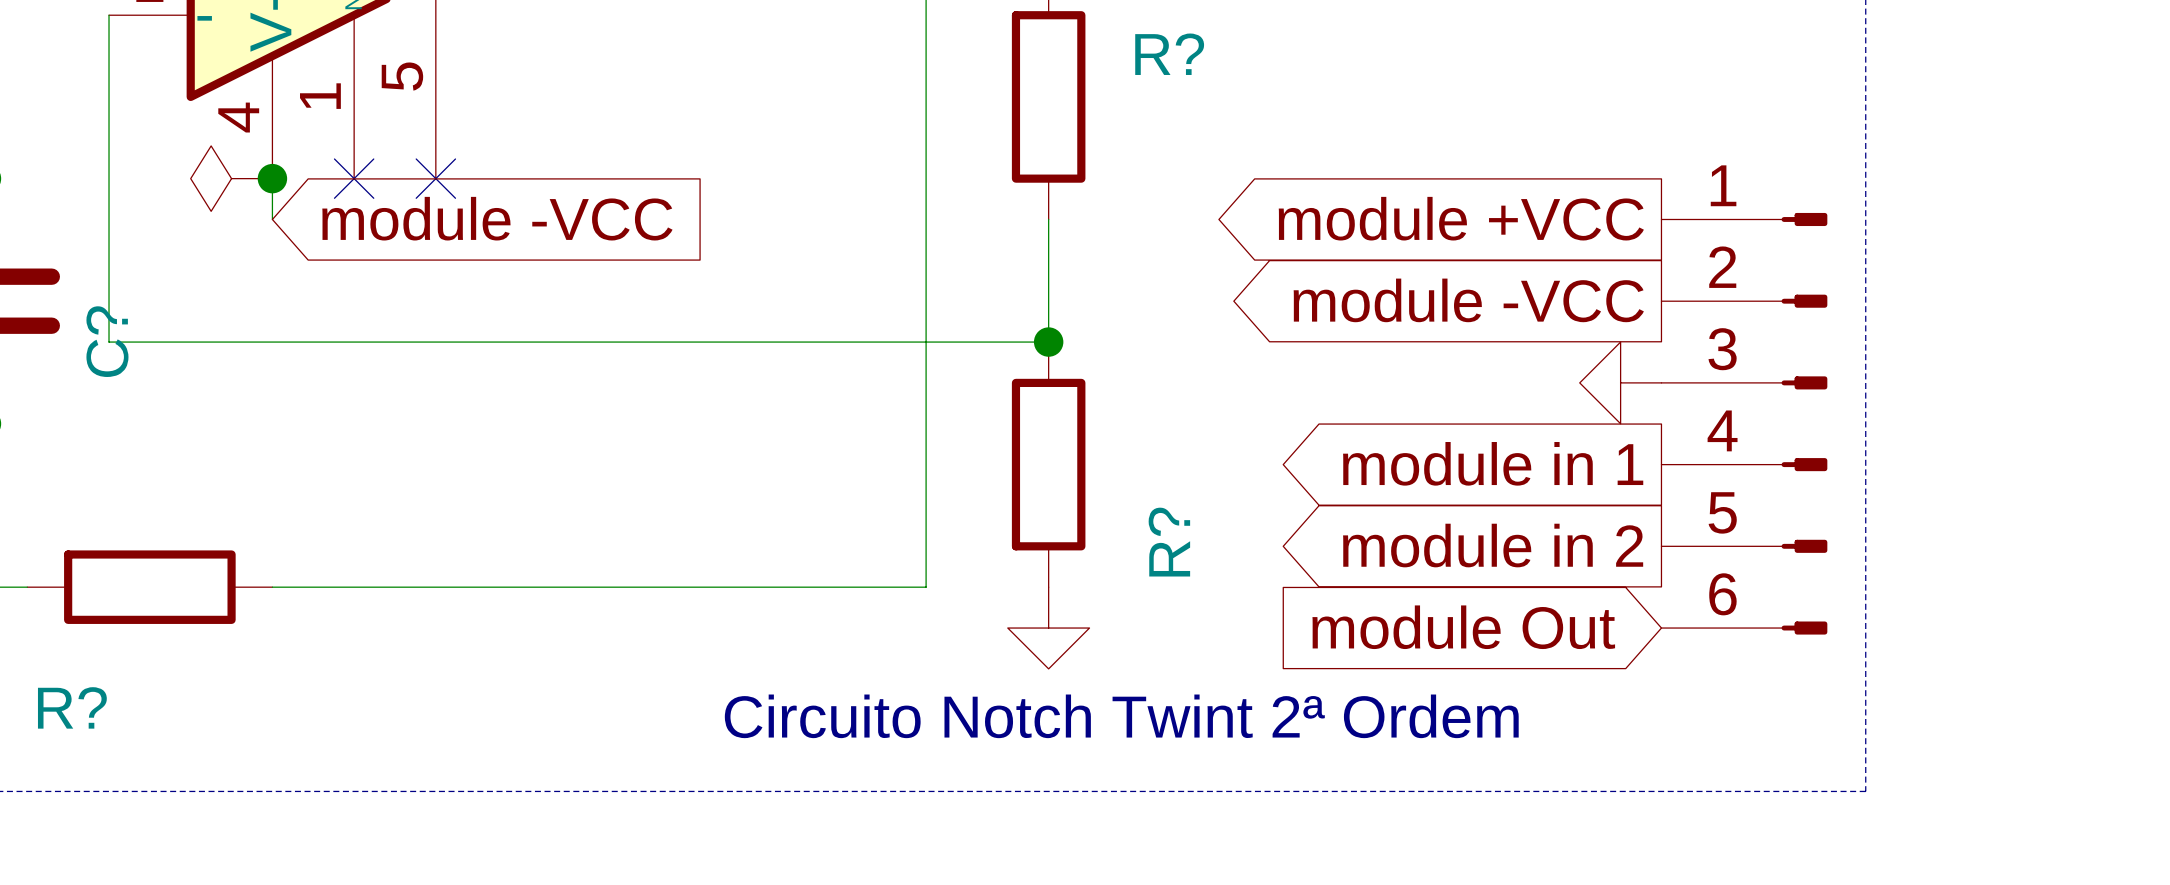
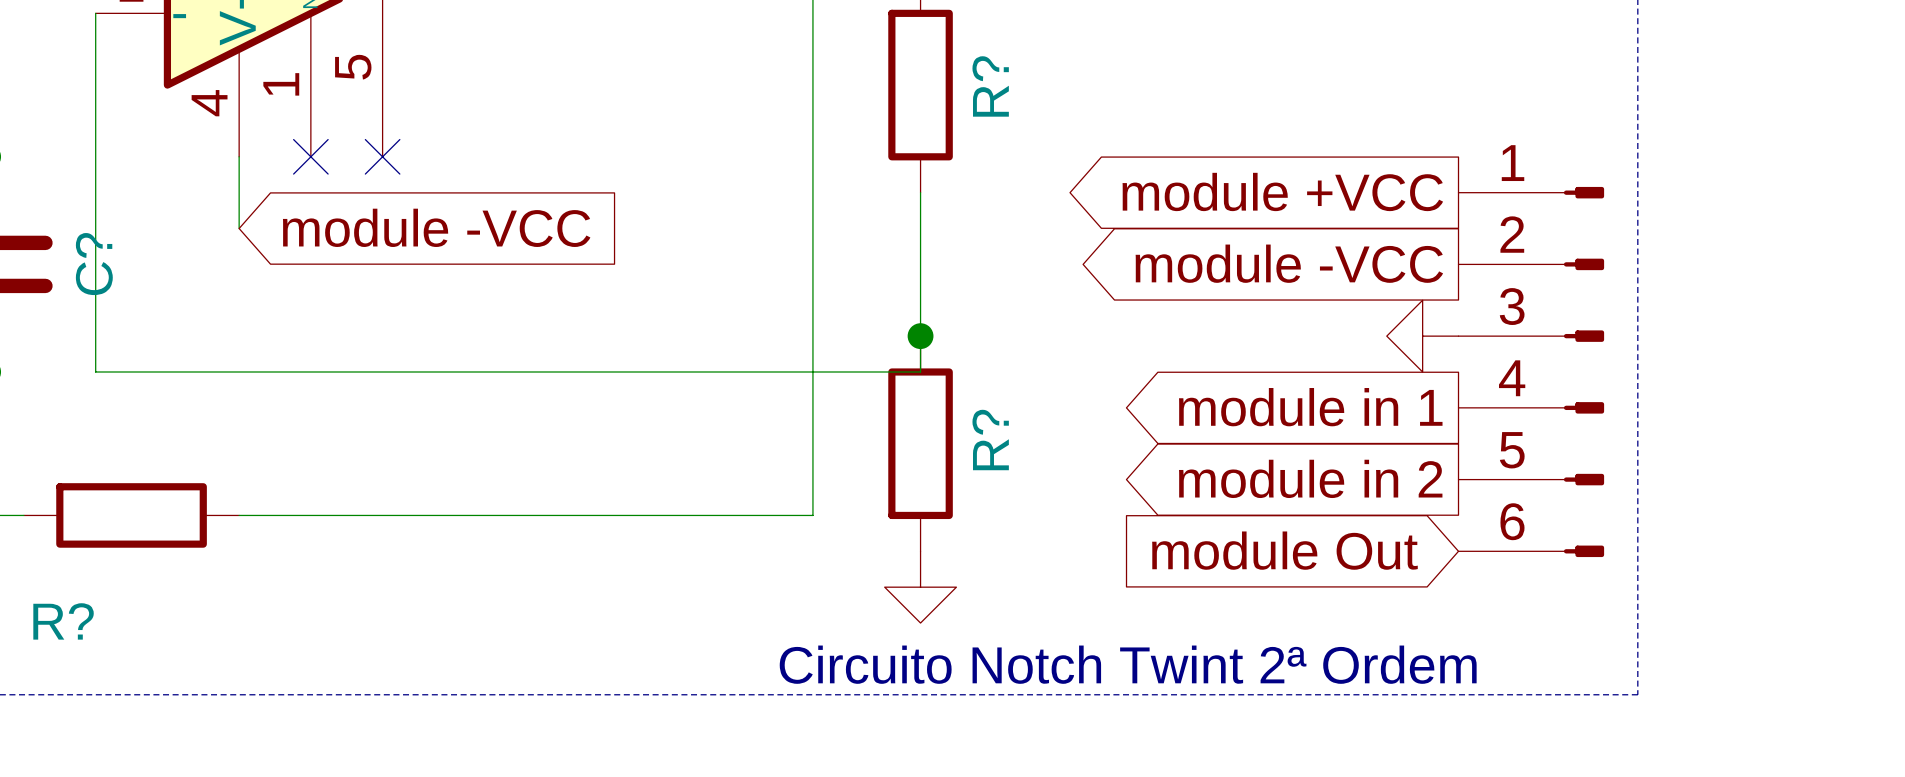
R? name rotation: 0° (1169, 54) -> 90° counterclockwise (990, 86)
power symbol: (231, 178) -> none
junction: (272, 178) -> none
global label position: module -VCC (497, 218) -> module -VCC (436, 227)
wire: none -> (239, 192) (239, 228)
C? name position: C? (107, 341) -> C? (94, 264)
wire: (109, 342) (1048, 342) -> (95, 300) (95, 371) (920, 371) (920, 300)
junction position: (1048, 342) -> (920, 336)
R? position: (1048, 464) -> (920, 443)
R? name position: R? (1169, 542) -> R? (990, 440)
power symbol position: (1048, 628) -> (920, 587)
text position: Circuito Notch Twint 2ª Ordem (1121, 716) -> Circuito Notch Twint 2ª Ordem (1128, 664)

